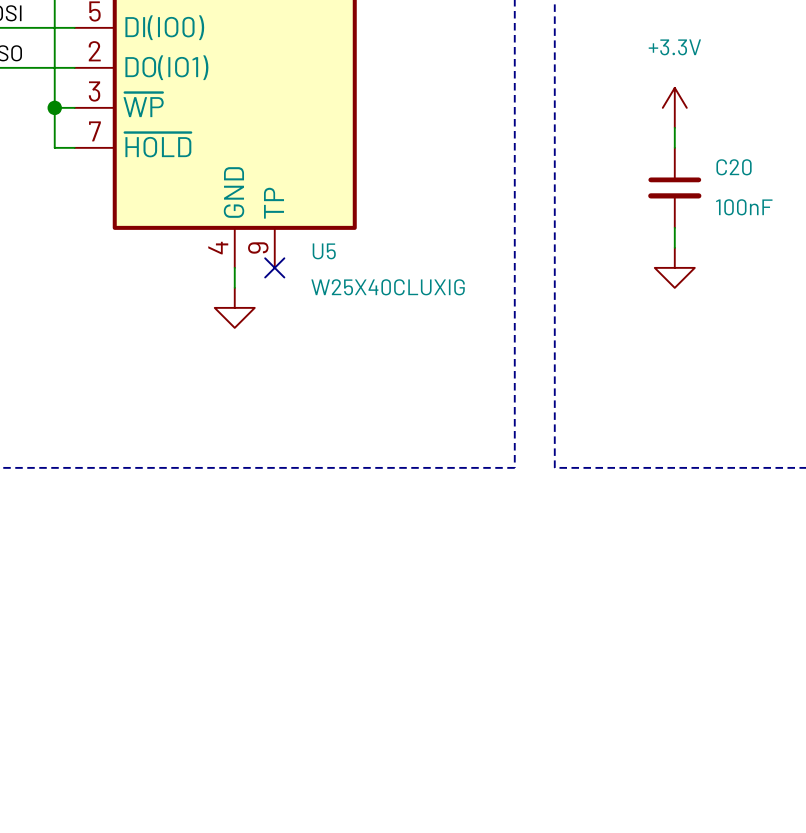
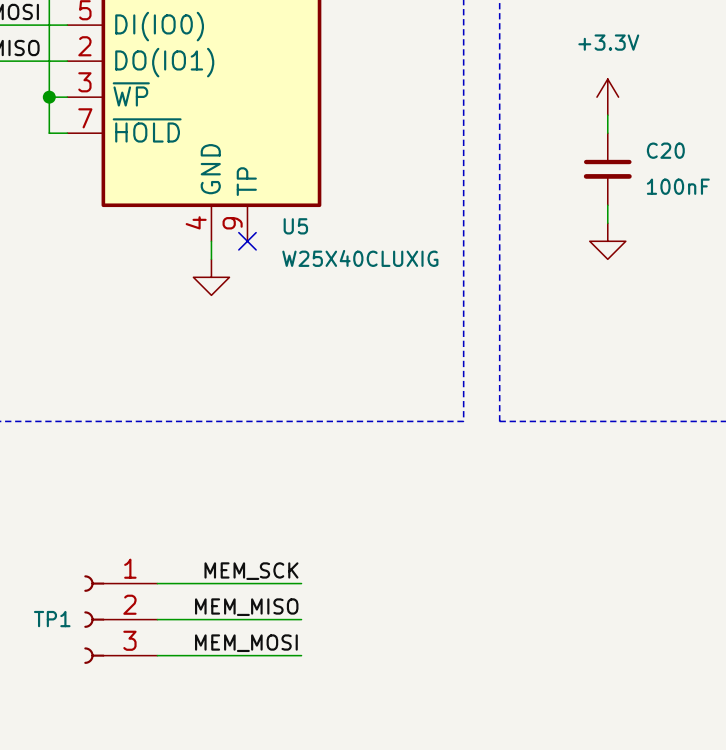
label: none -> MEM_SCK (251, 571)
wire: none -> (157, 583) (301, 583)
label: none -> MEM_MISO (246, 607)
TP1: none -> (120, 619)
wire: none -> (157, 619) (301, 619)
label: none -> MEM_MOSI (246, 643)
wire: none -> (157, 655) (301, 655)

